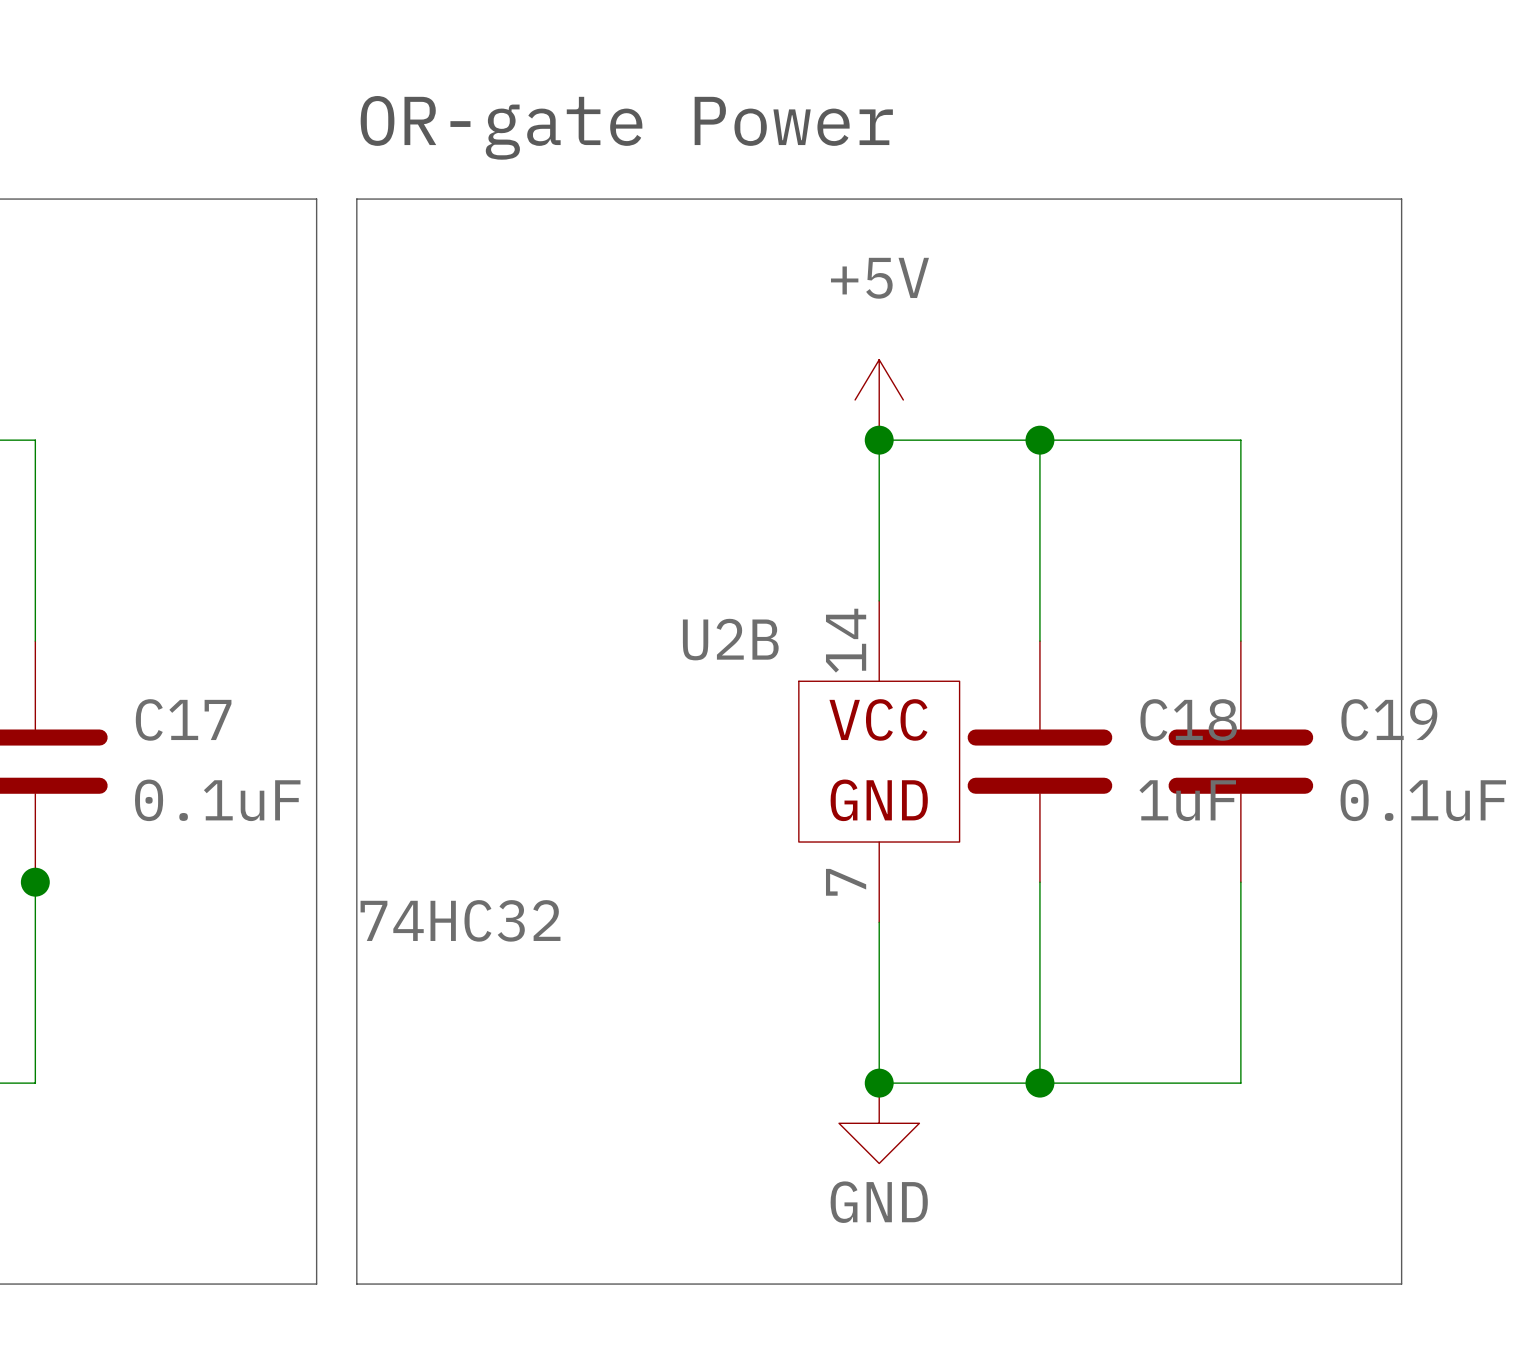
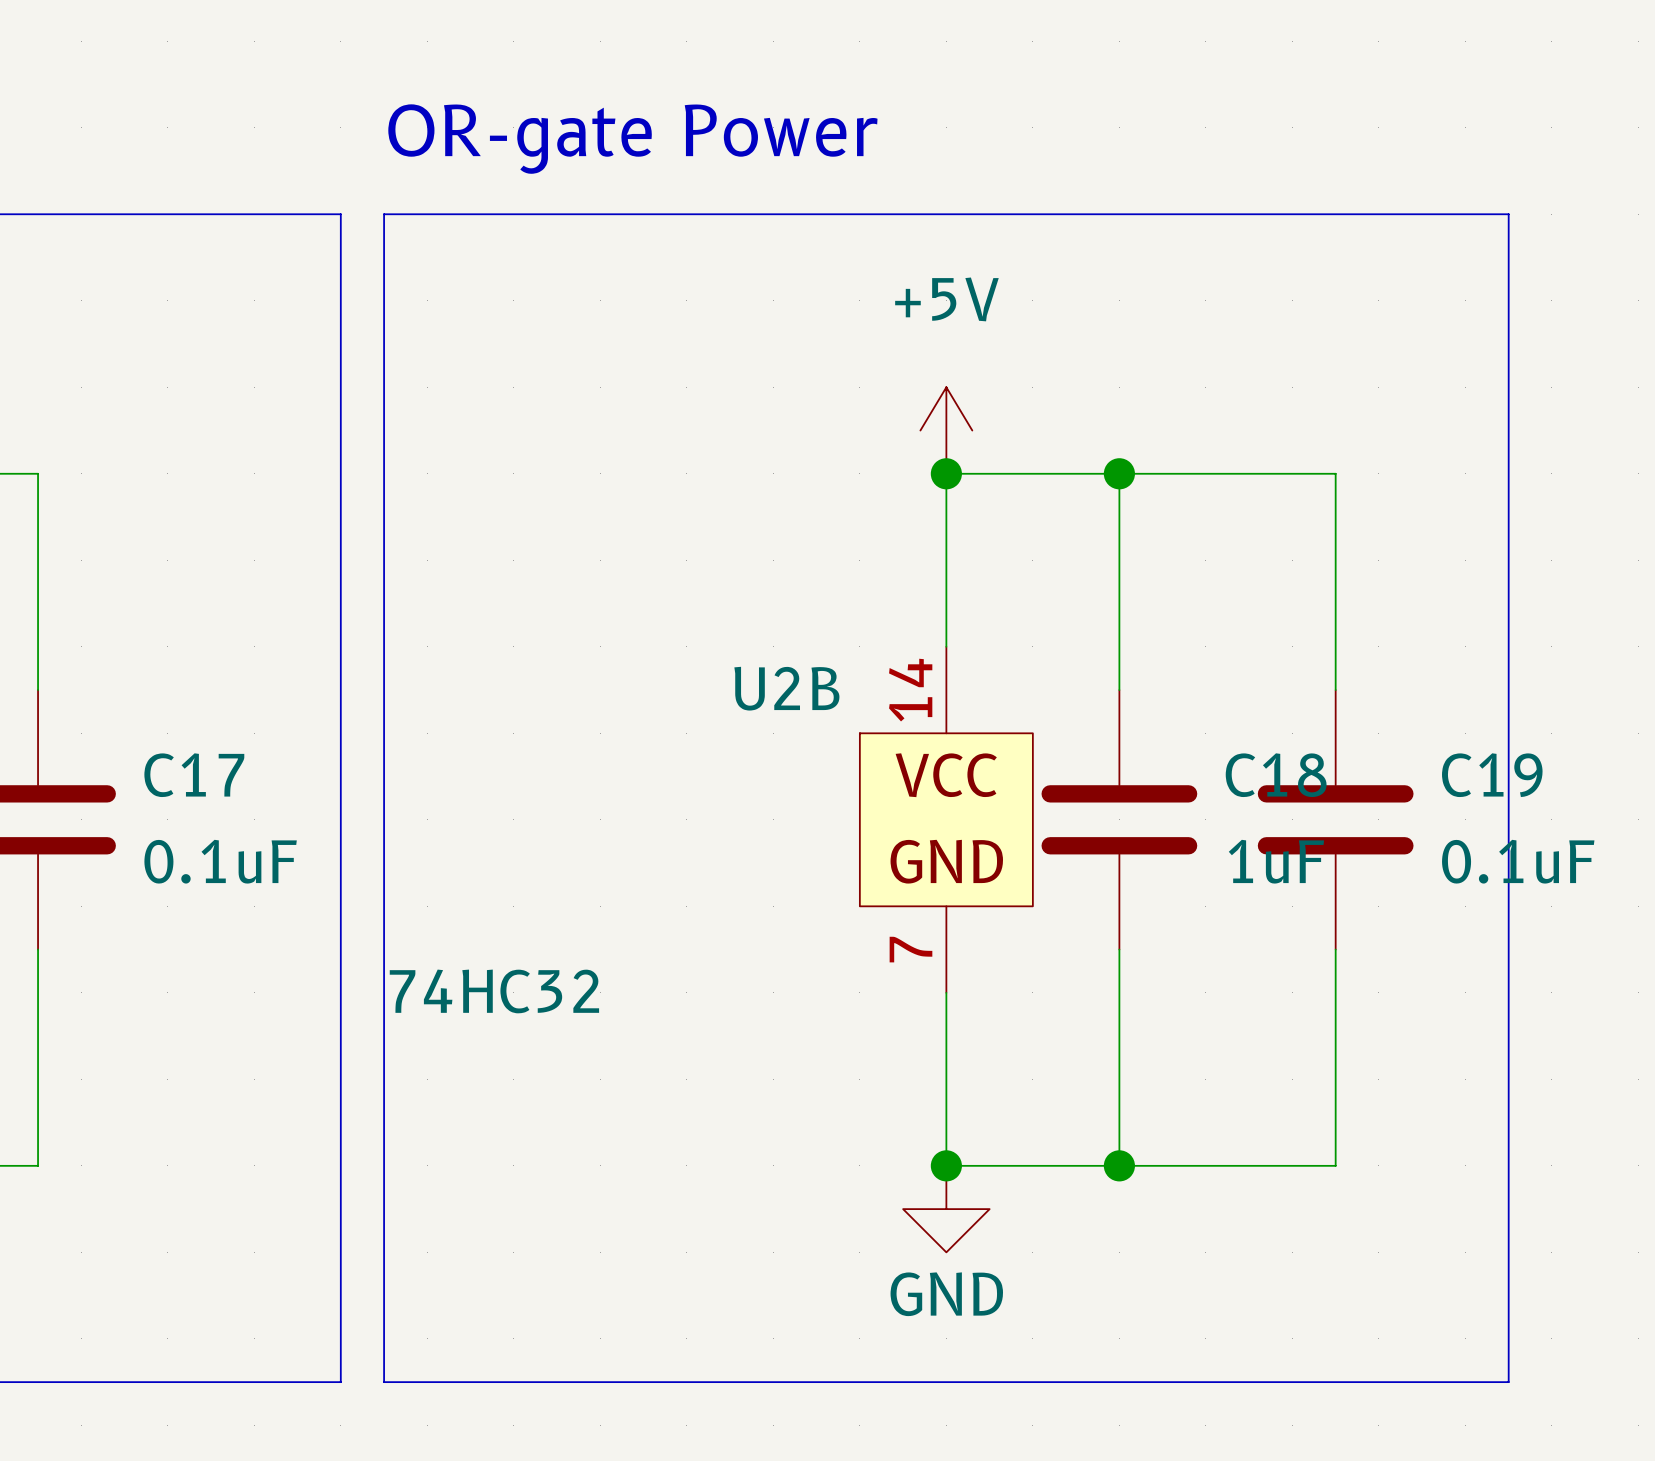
junction: (35, 882) -> none

